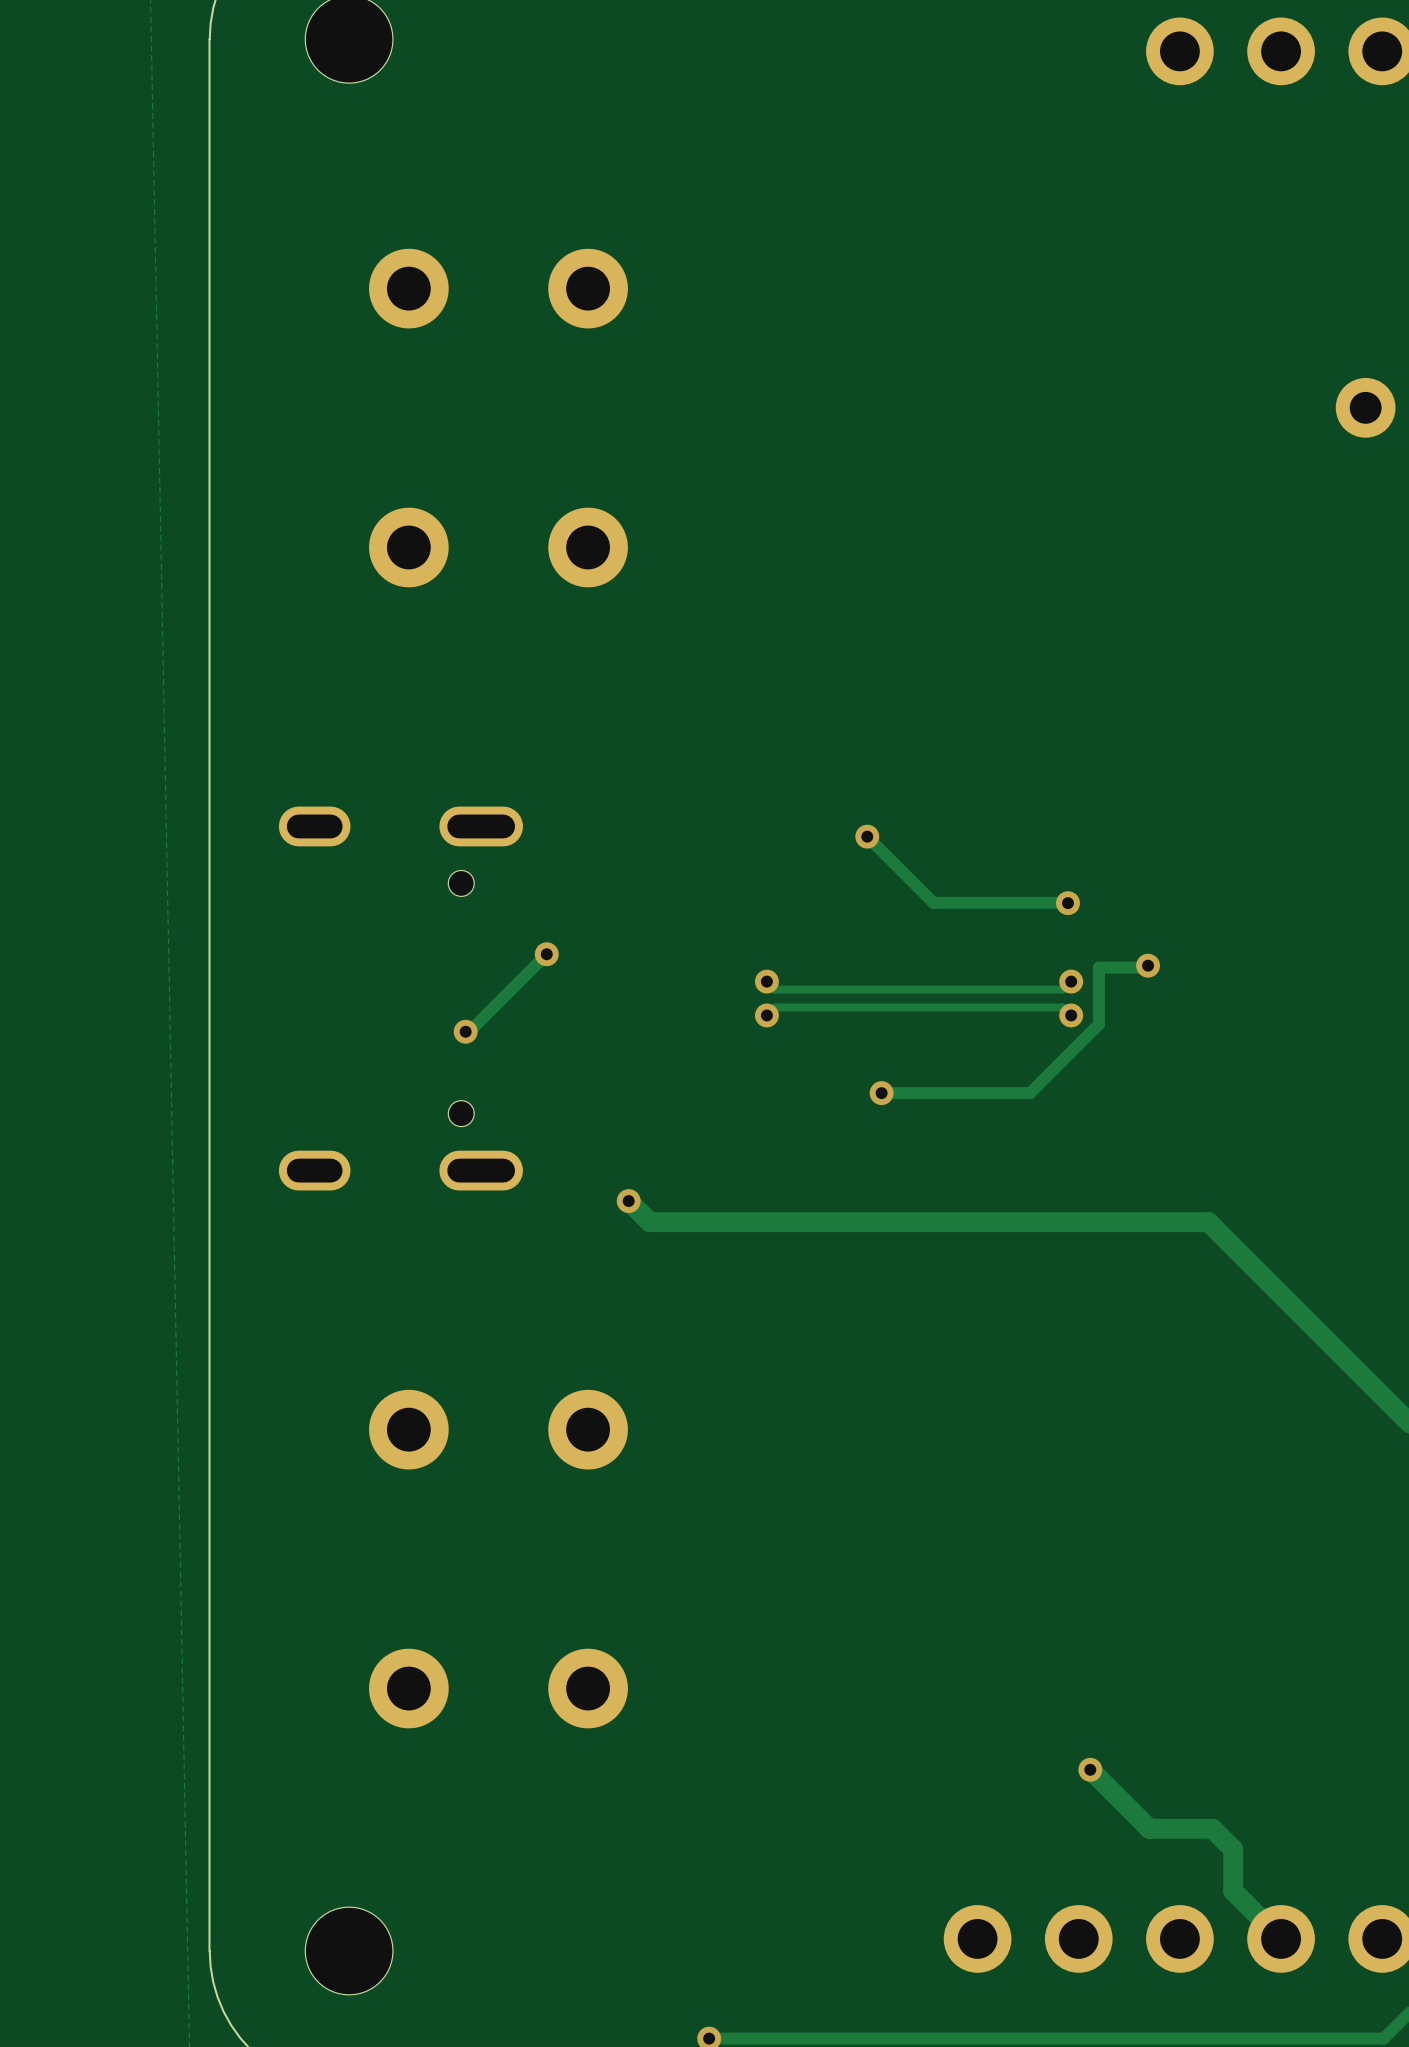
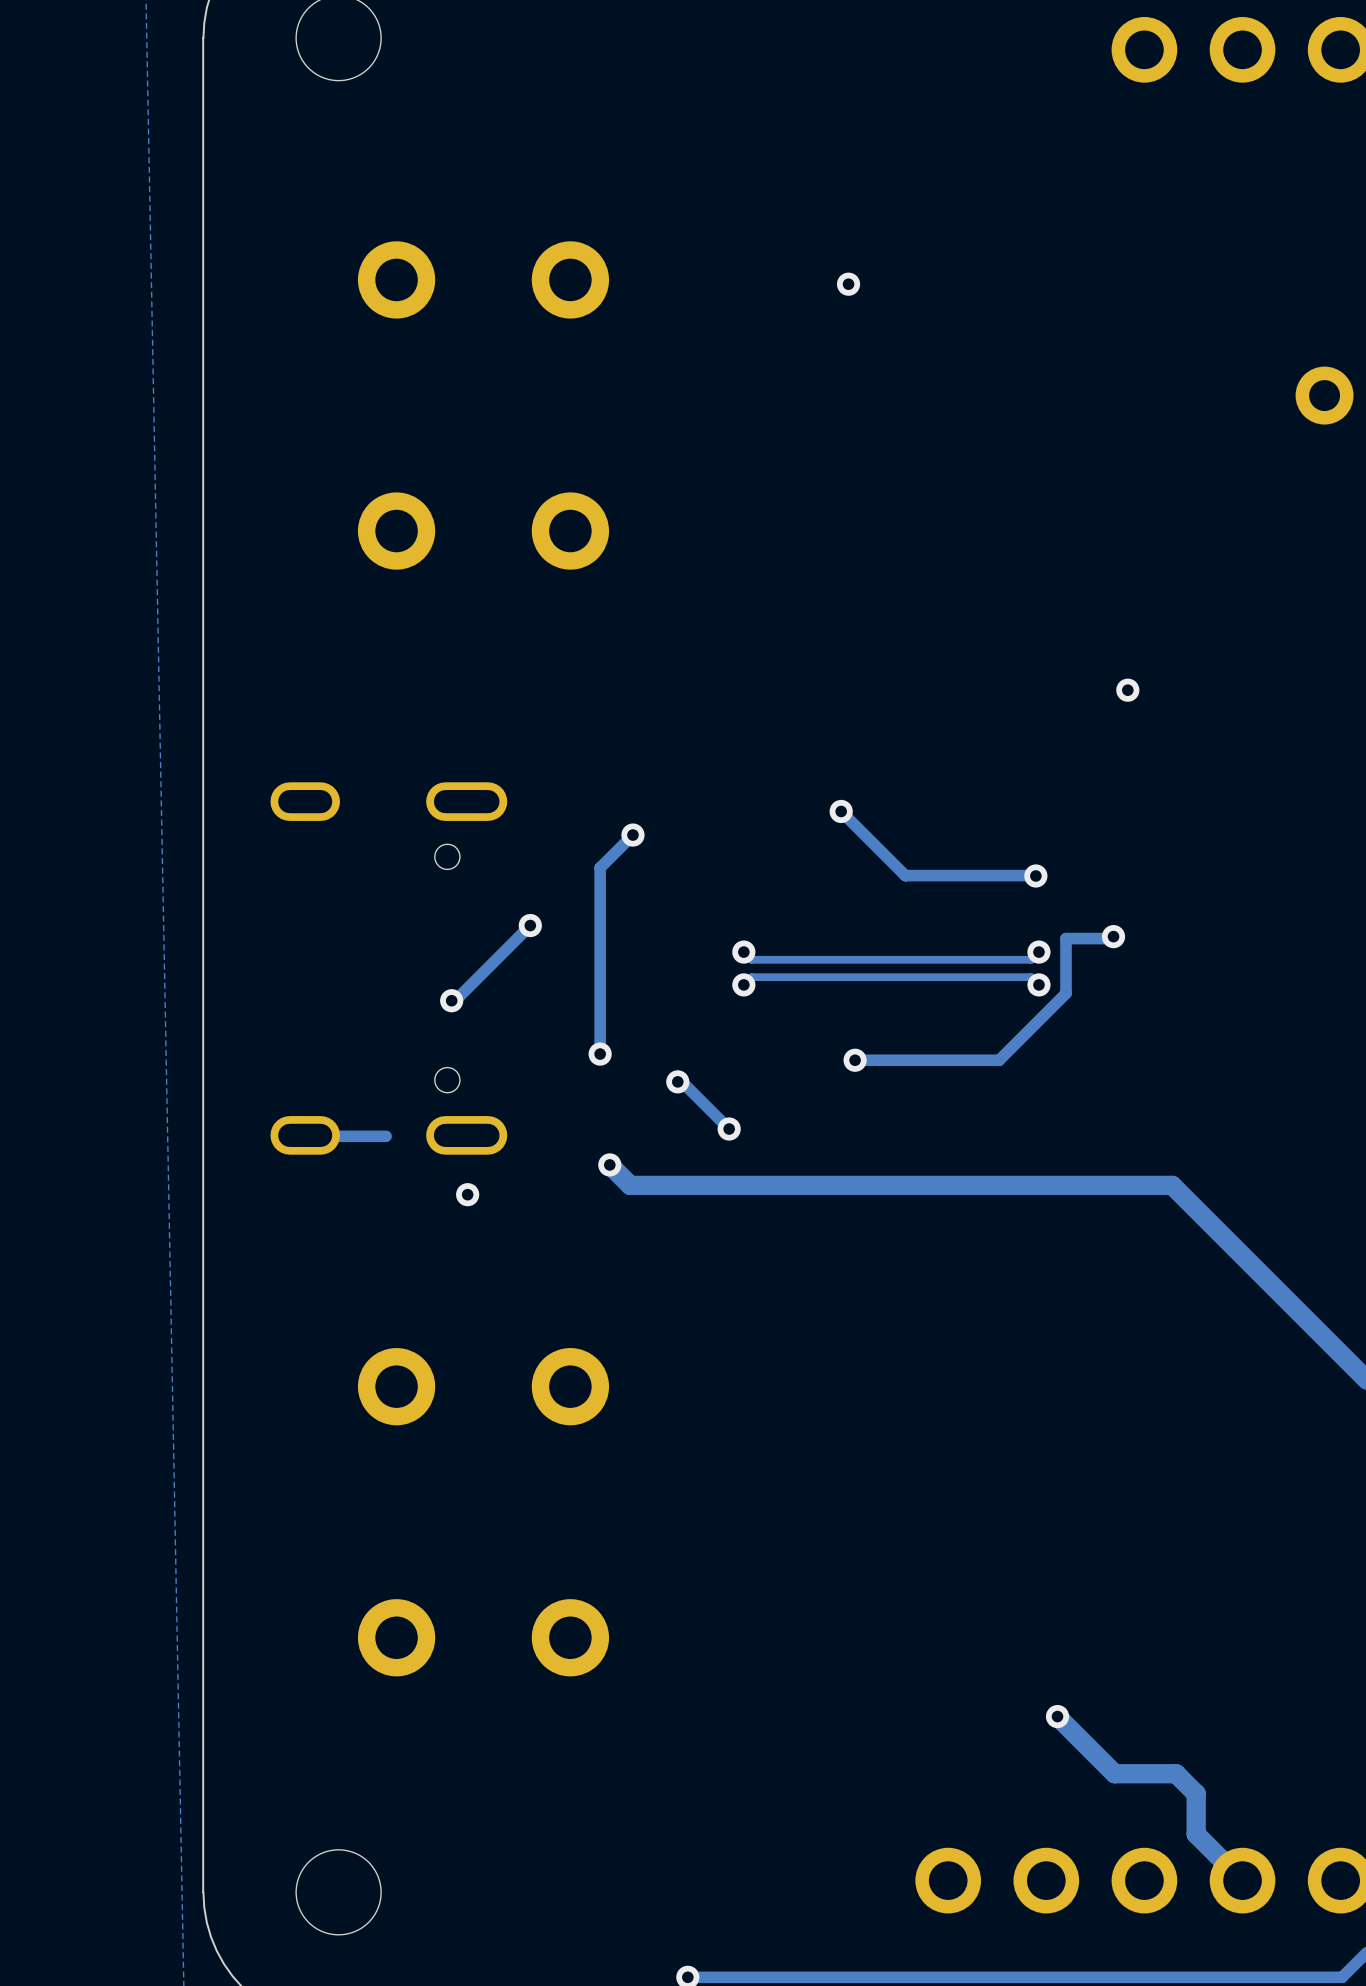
via: none -> (848, 284)
via: none -> (1127, 690)
track: none -> (632, 835) (600, 867) (600, 1054)
via: none -> (632, 835)
via: none -> (600, 1054)
track: none -> (677, 1081) (682, 1081) (729, 1129)
via: none -> (677, 1081)
via: none -> (729, 1129)
track: none -> (305, 1135) (386, 1136)
via: none -> (467, 1194)

